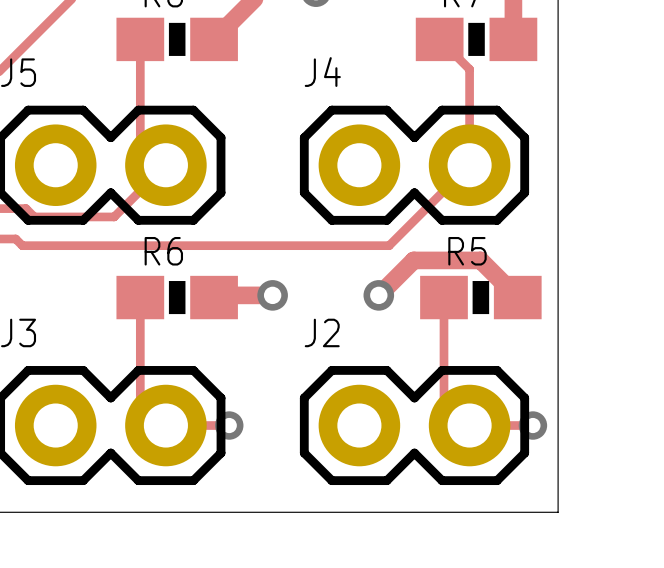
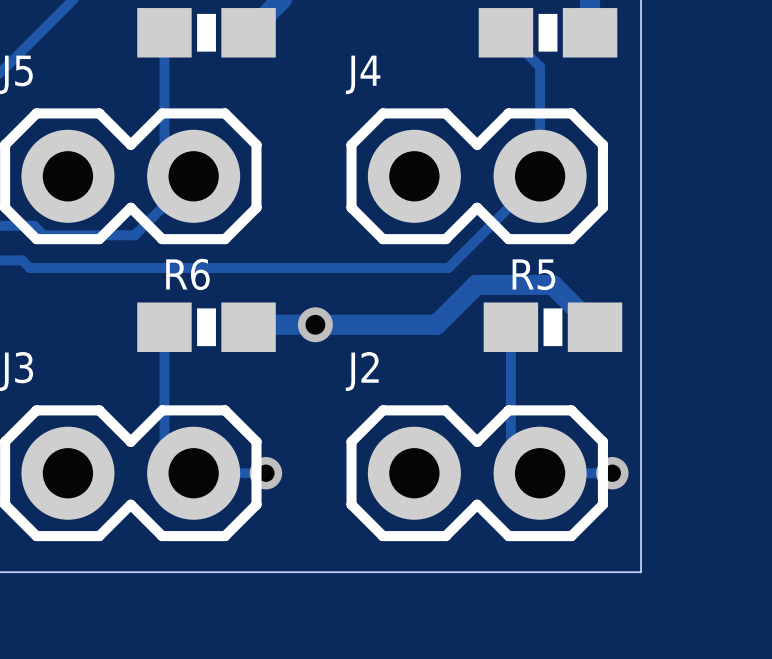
track: none -> (315, 324) (436, 324)
via: (378, 295) -> none

